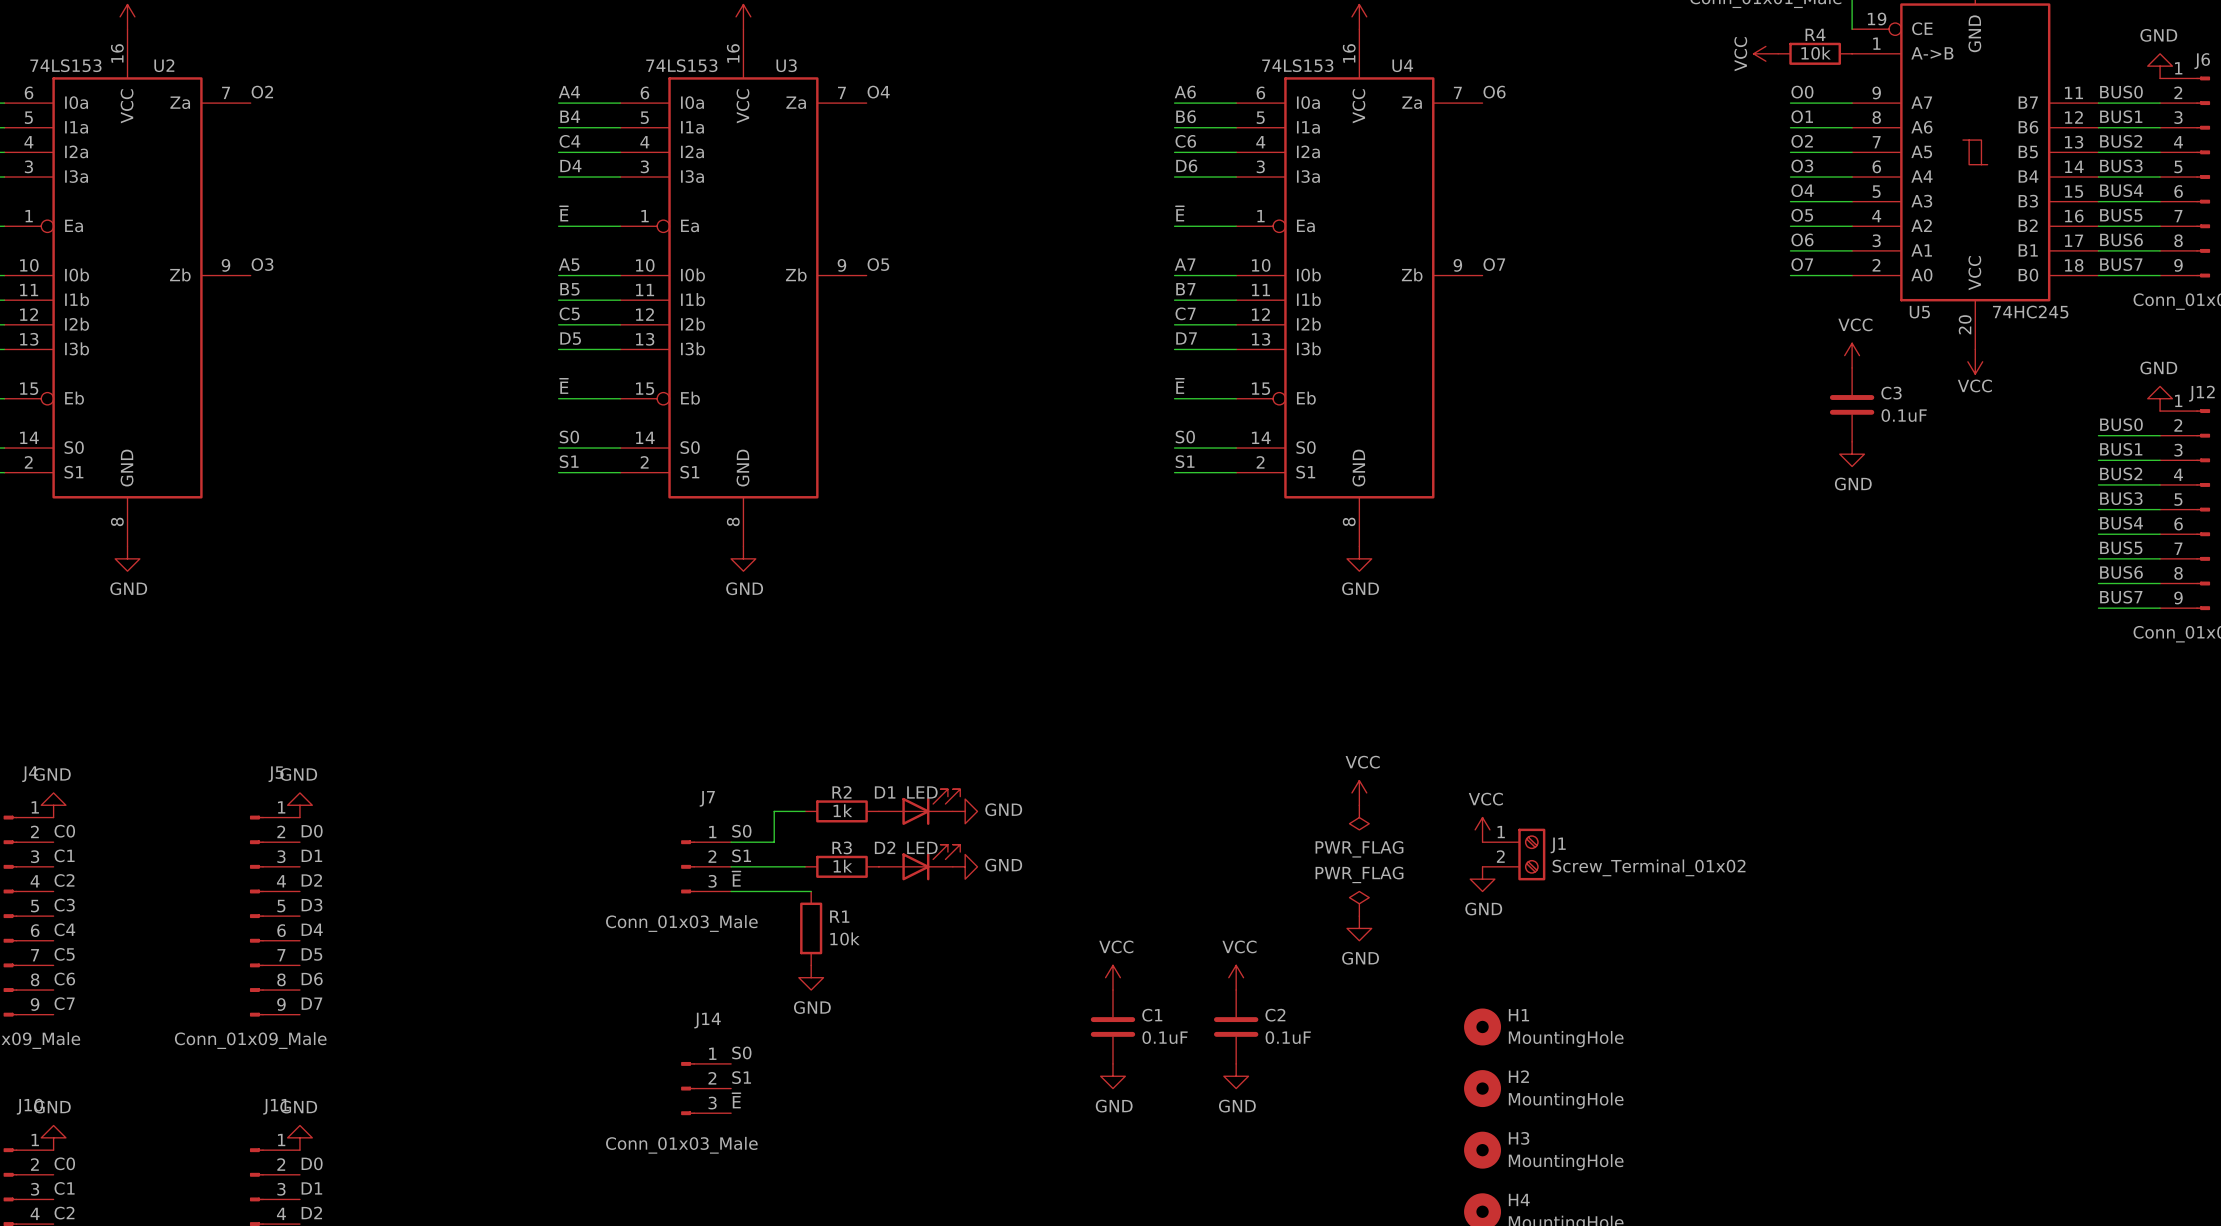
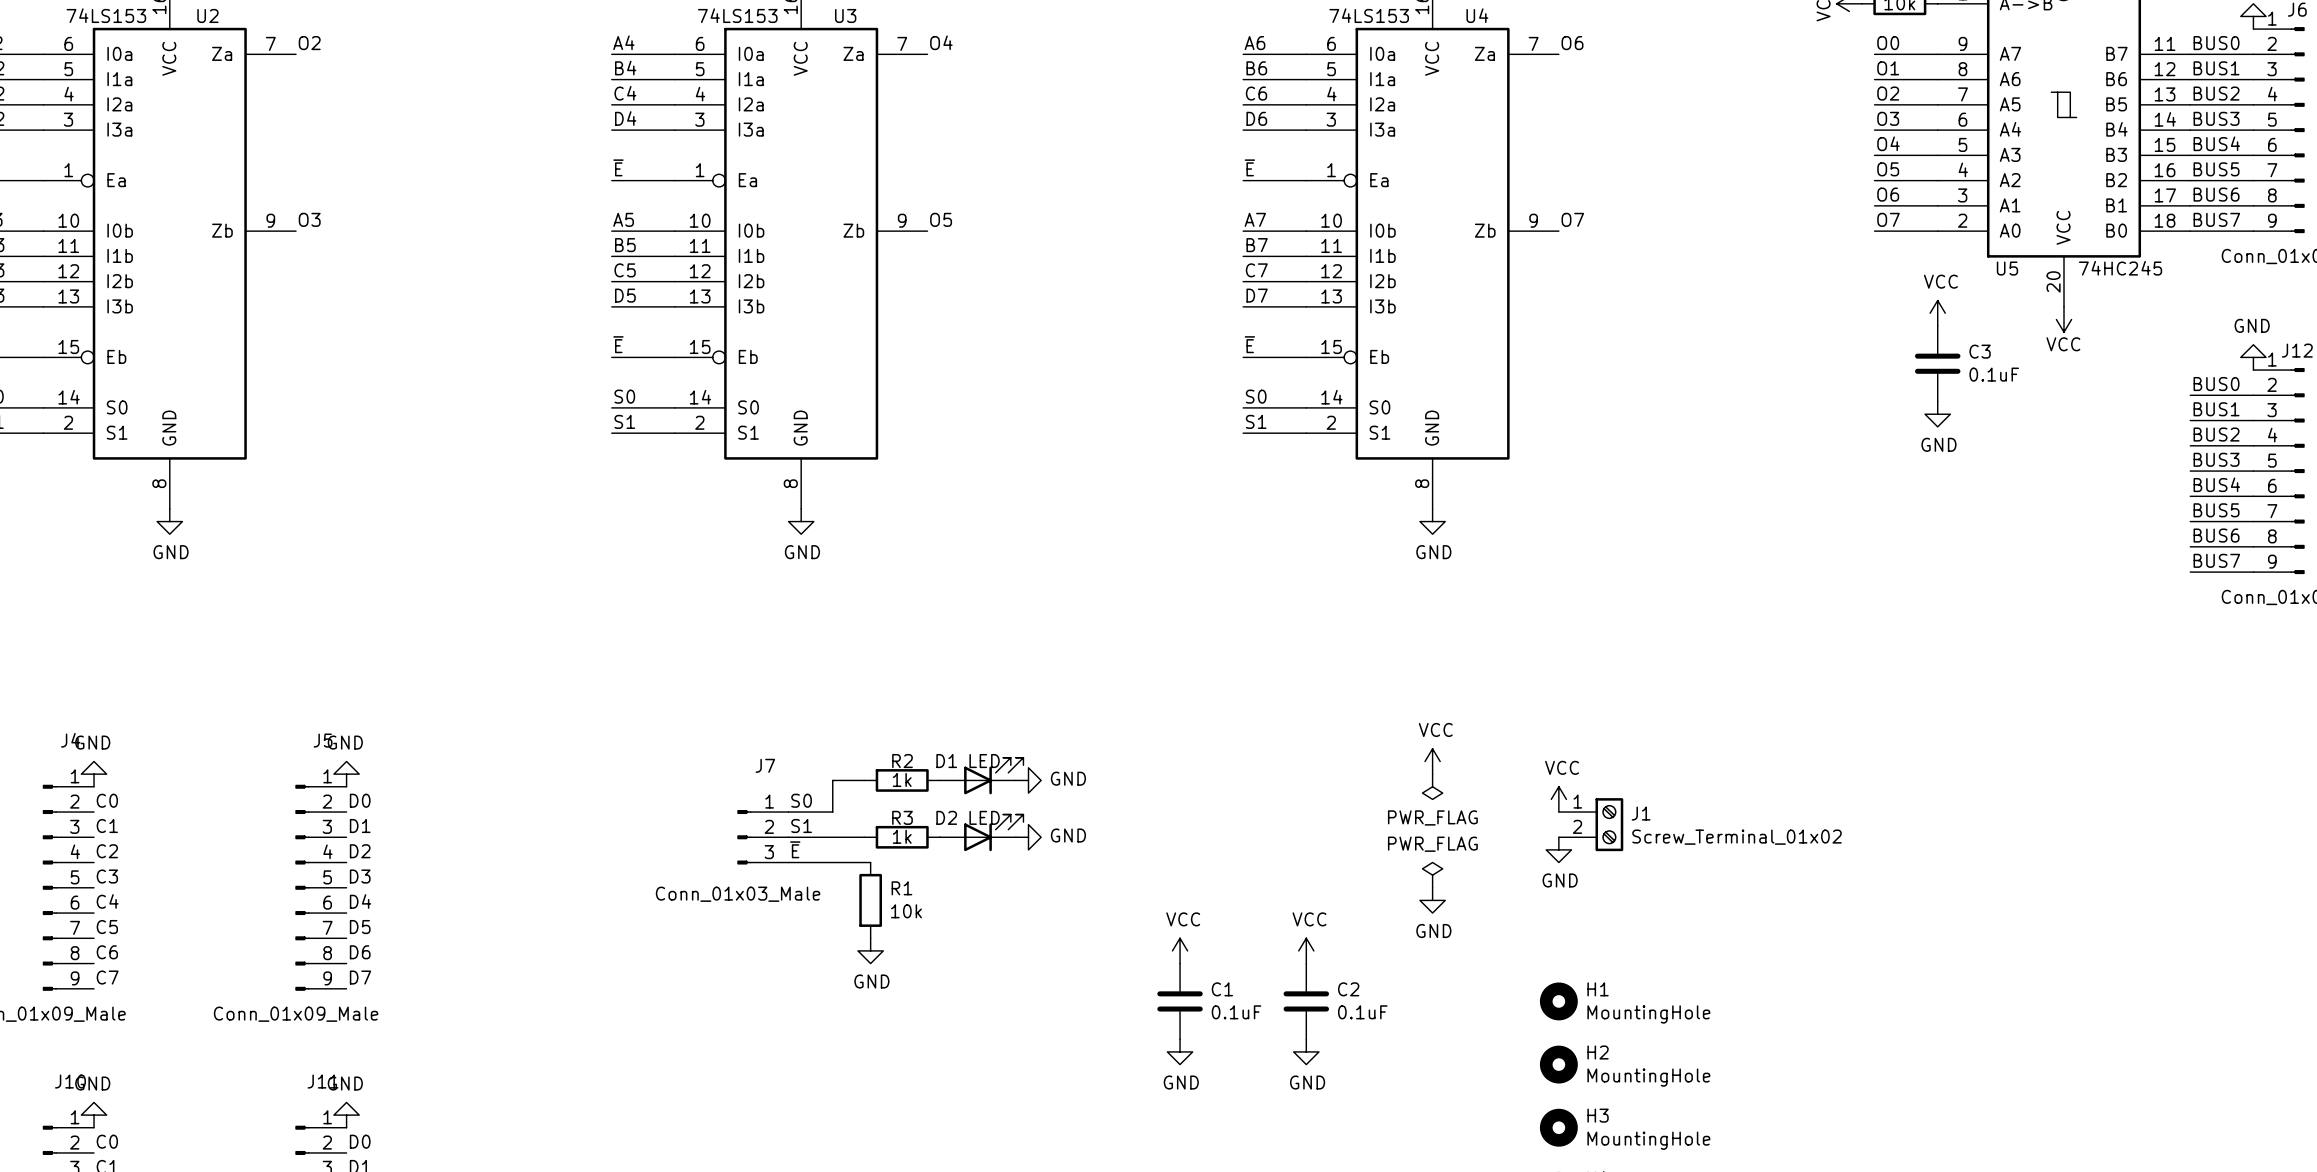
label: S0 (741, 1052) -> none
label: S1 (741, 1077) -> none
J14: Conn_01x03_Male (706, 1088) -> none
label: ~{E} (736, 1100) -> none

